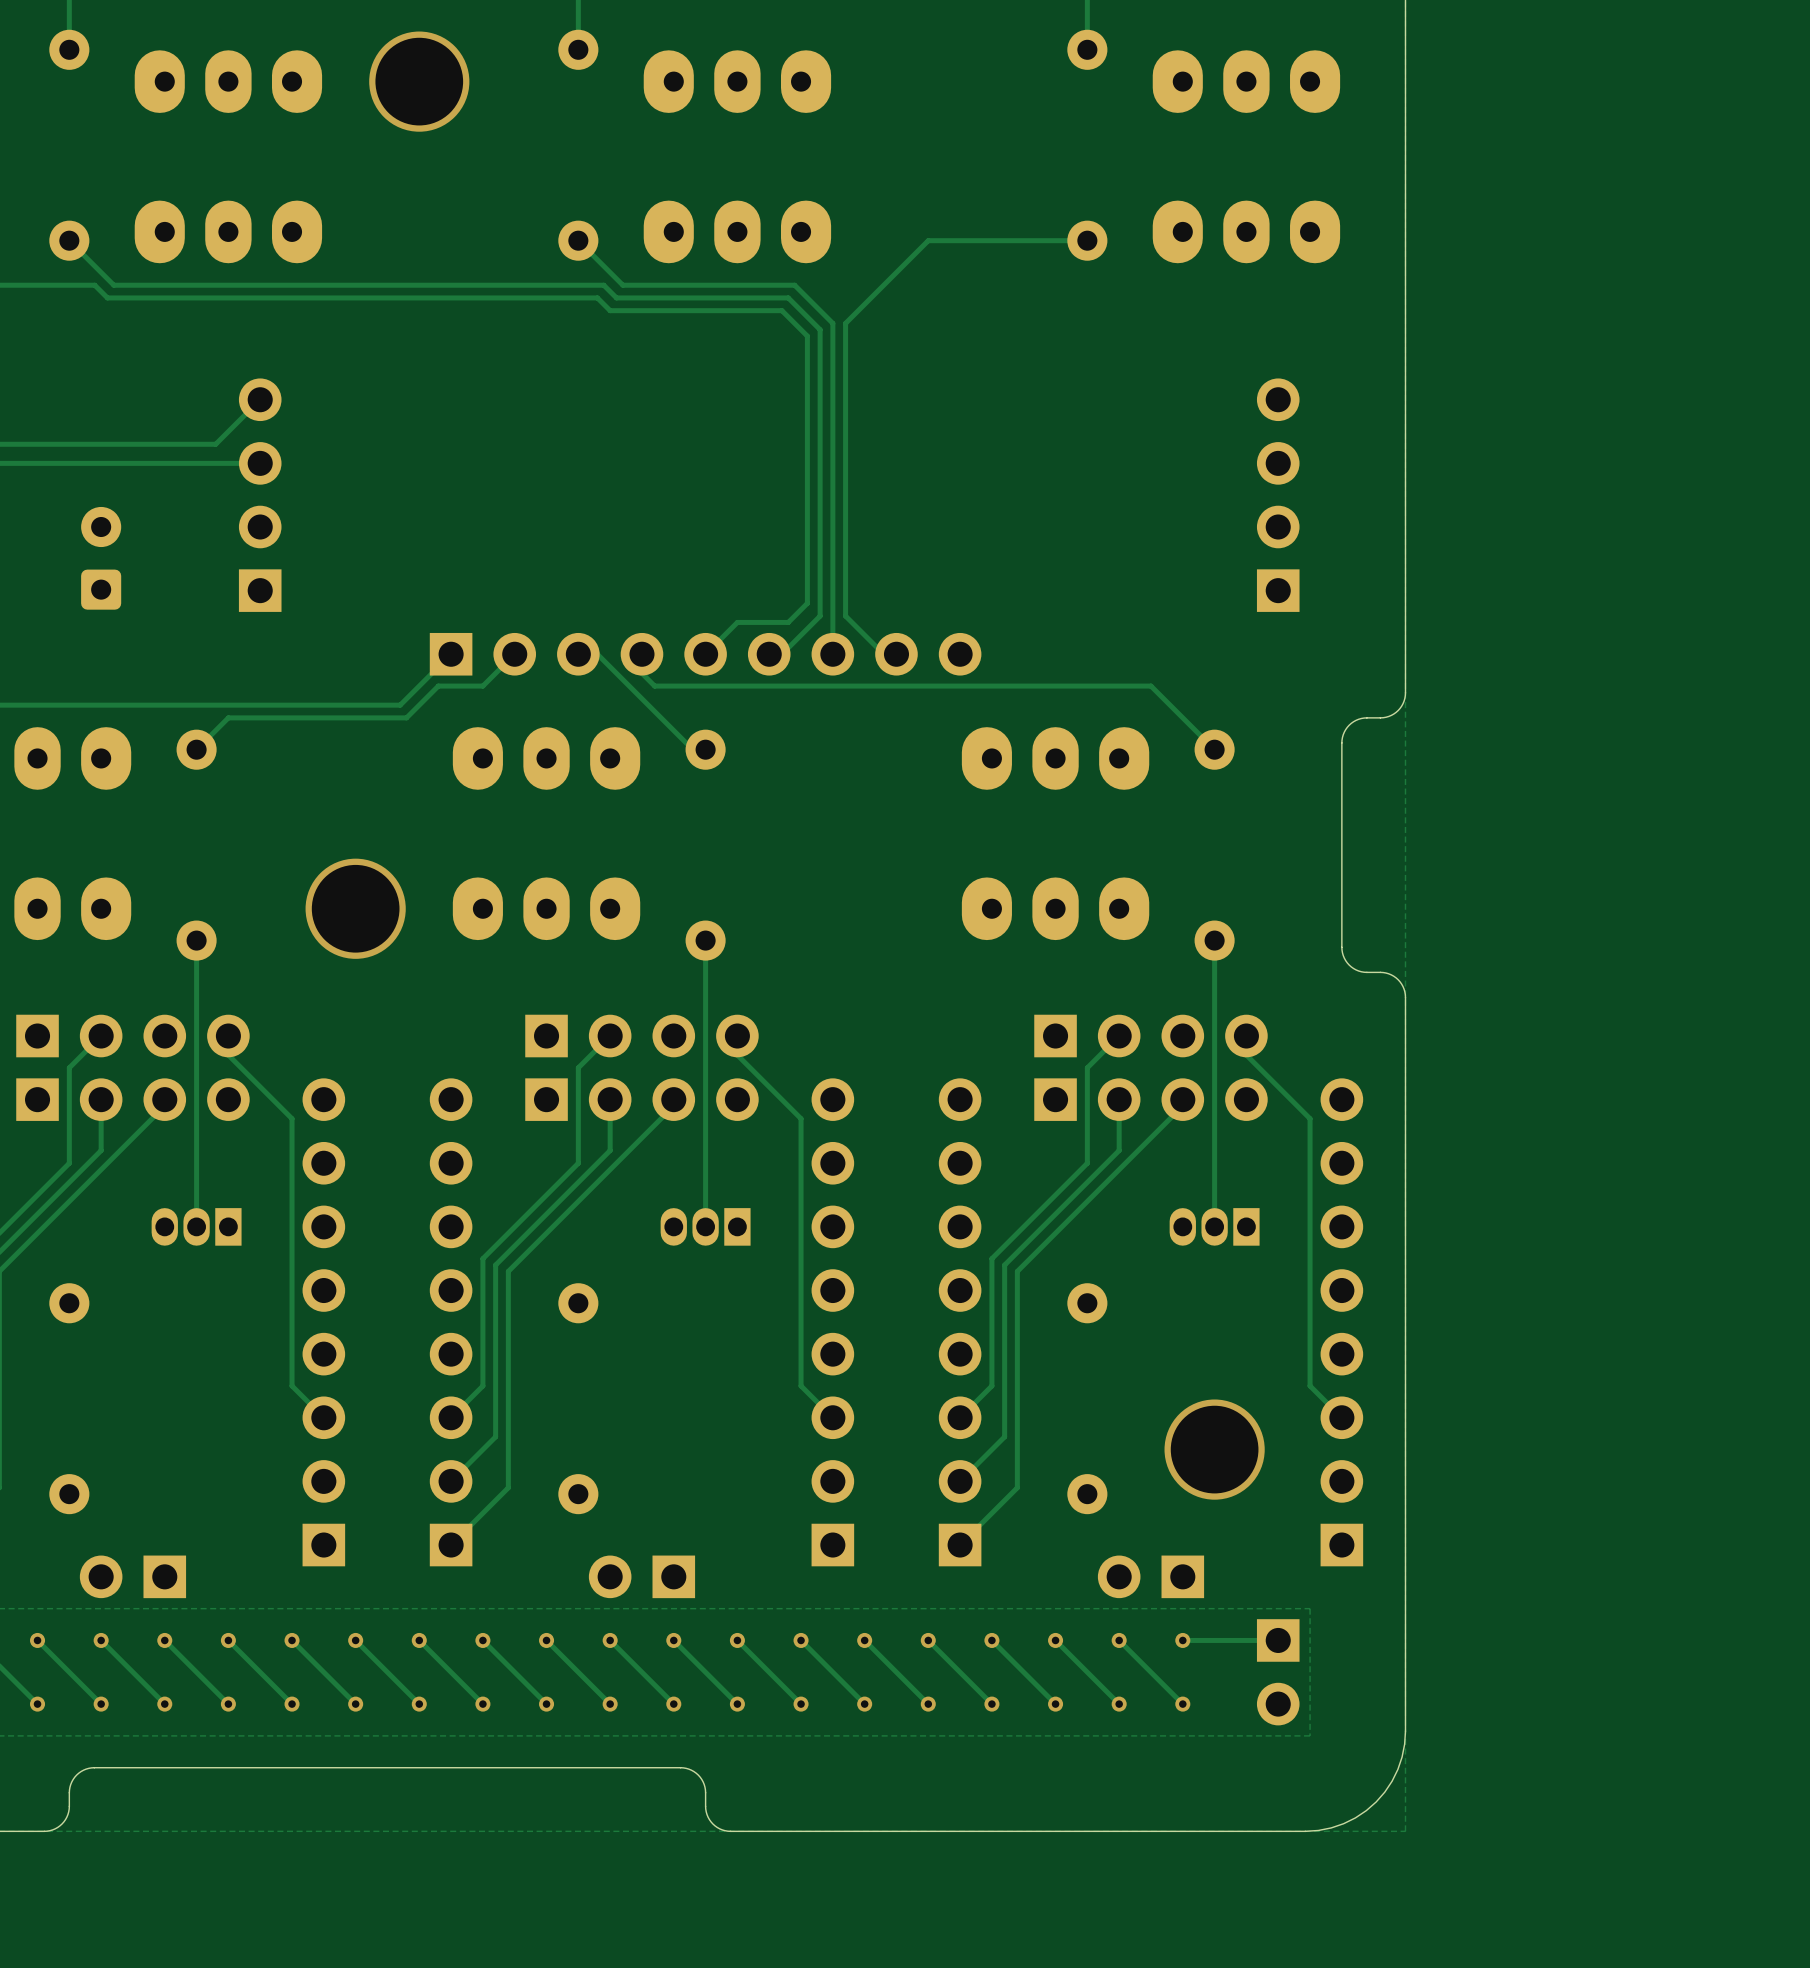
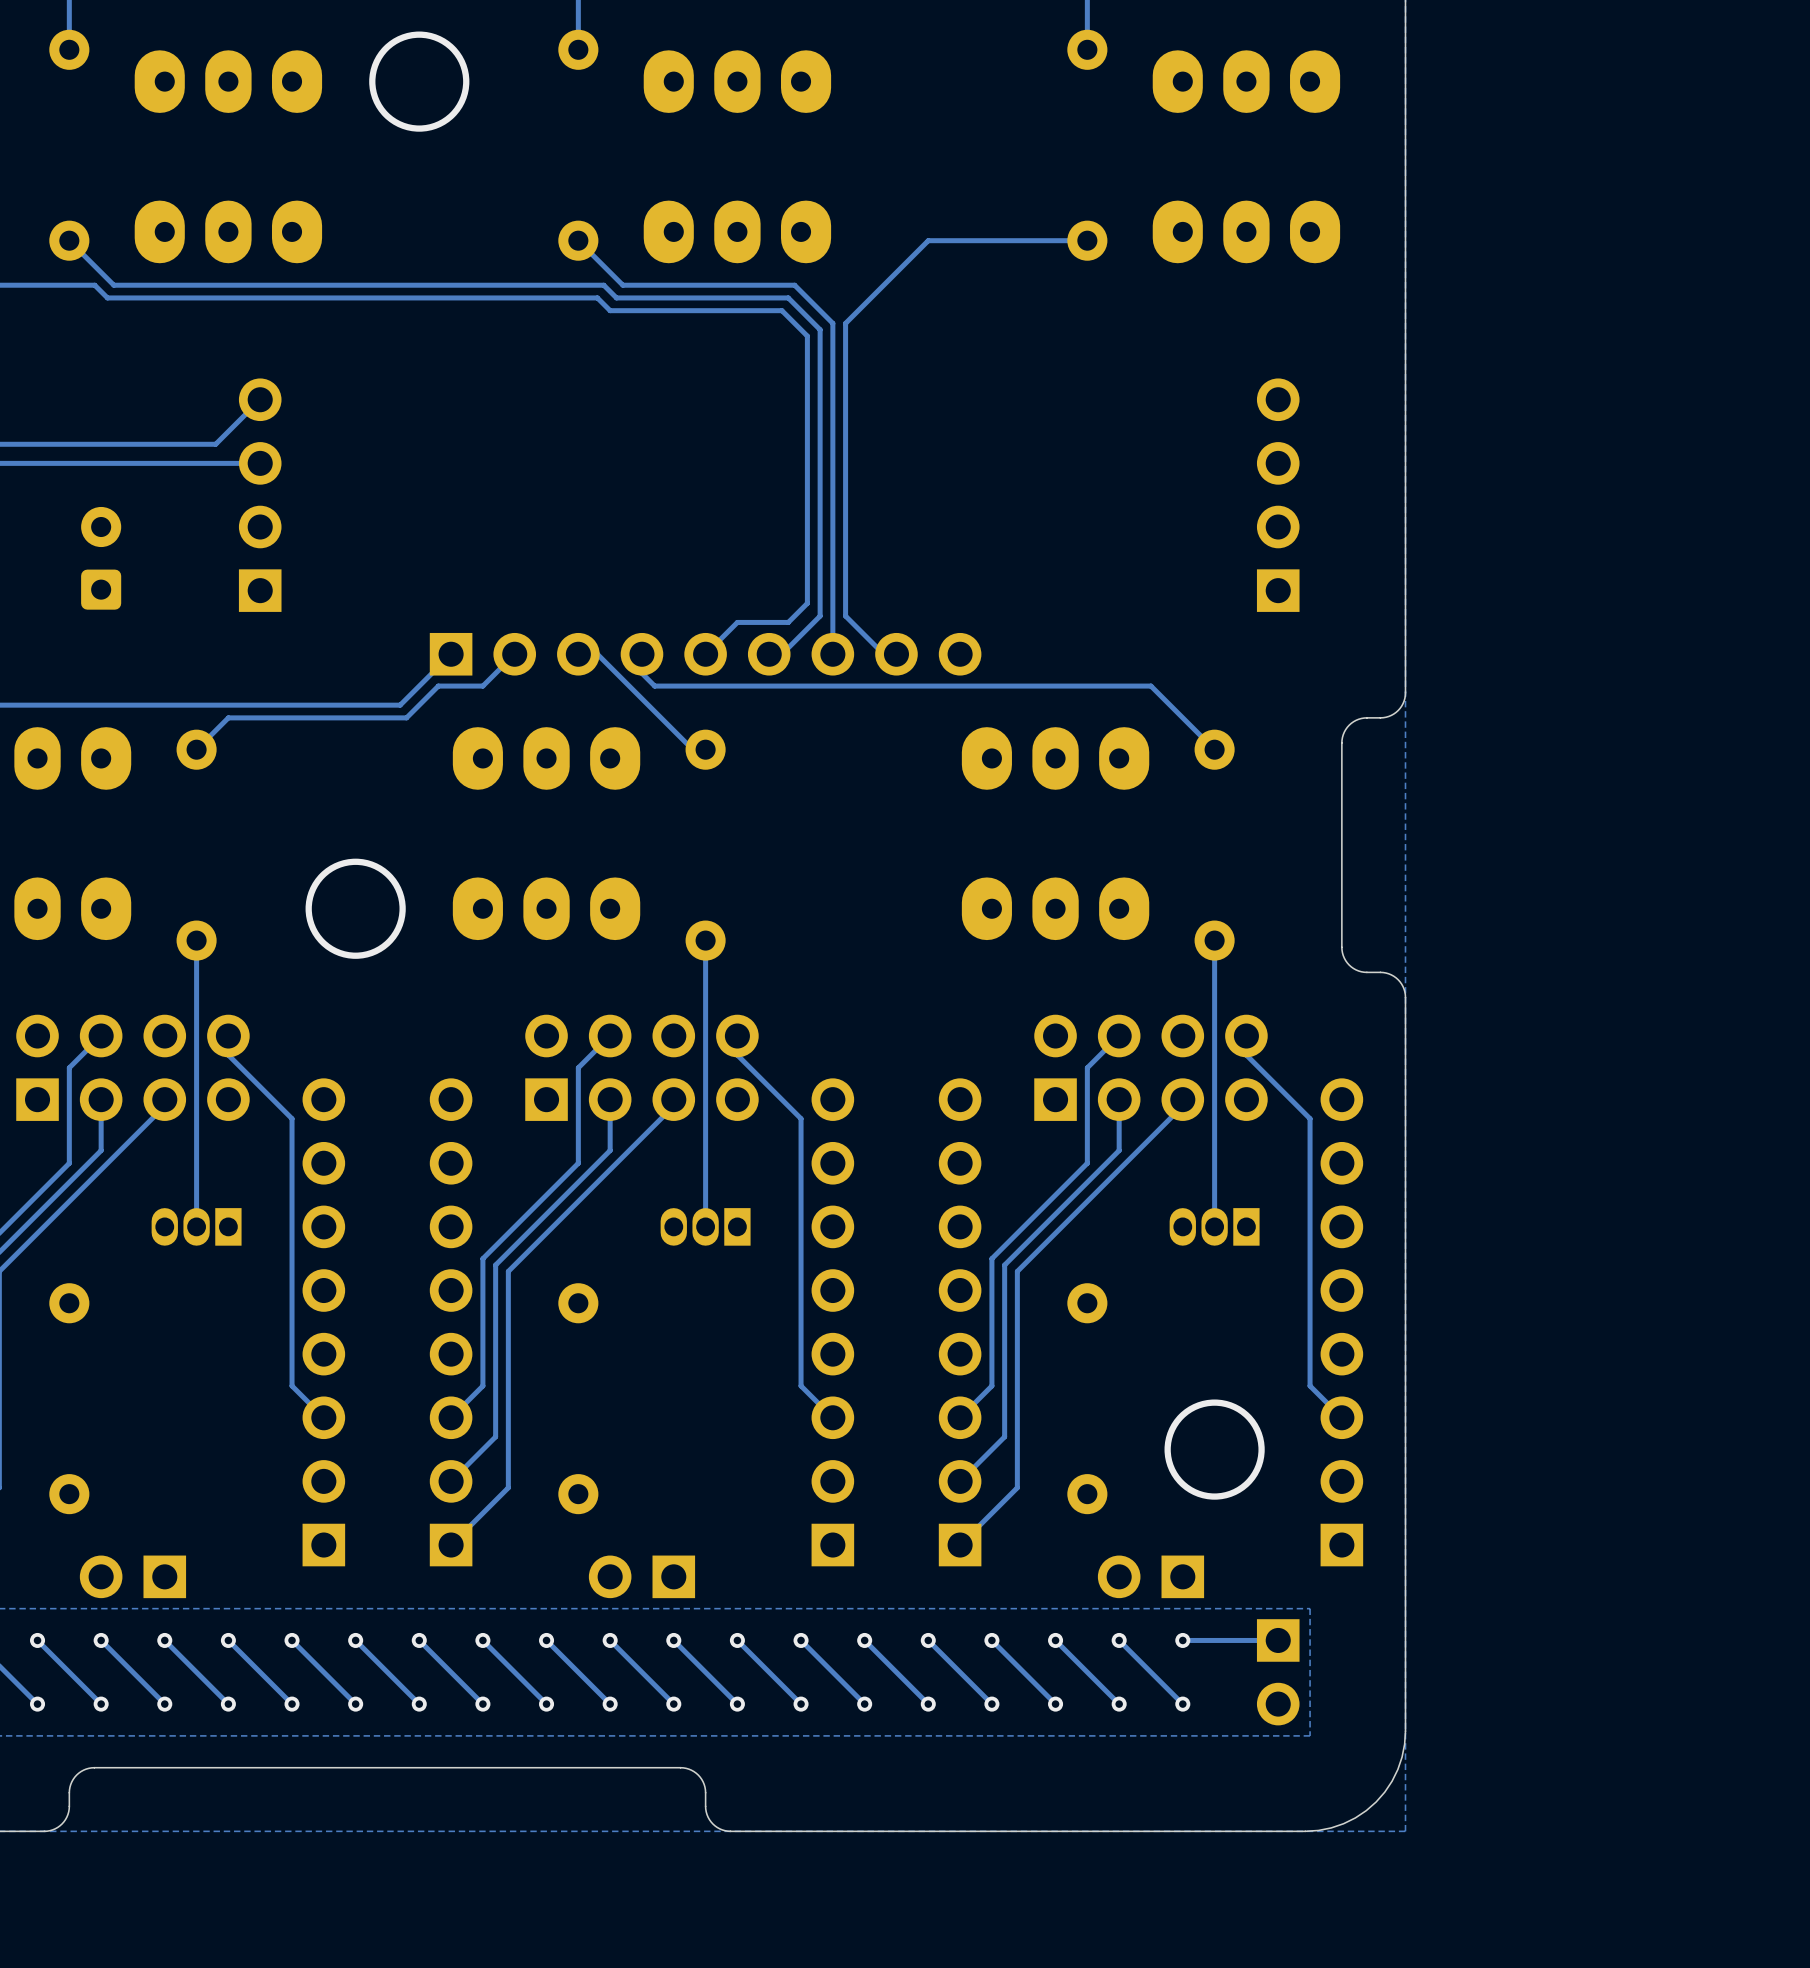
part: (132, 1036) -> none
part: (641, 1036) -> none
part: (1150, 1036) -> none
part: none -> (132, 1067)
part: none -> (641, 1067)
part: none -> (1150, 1067)

